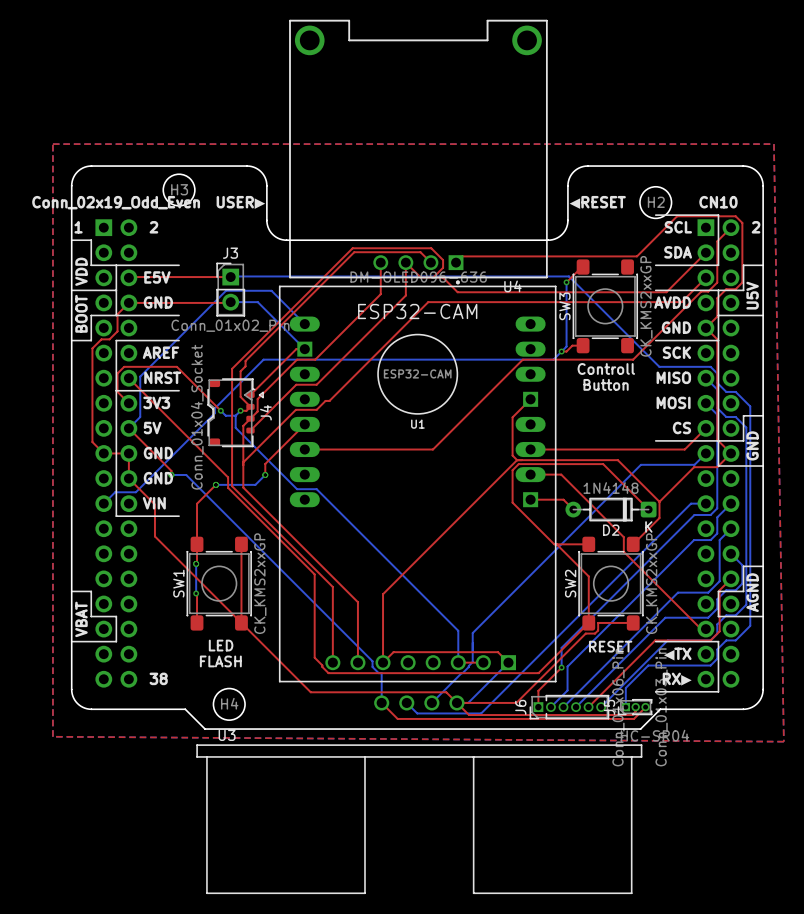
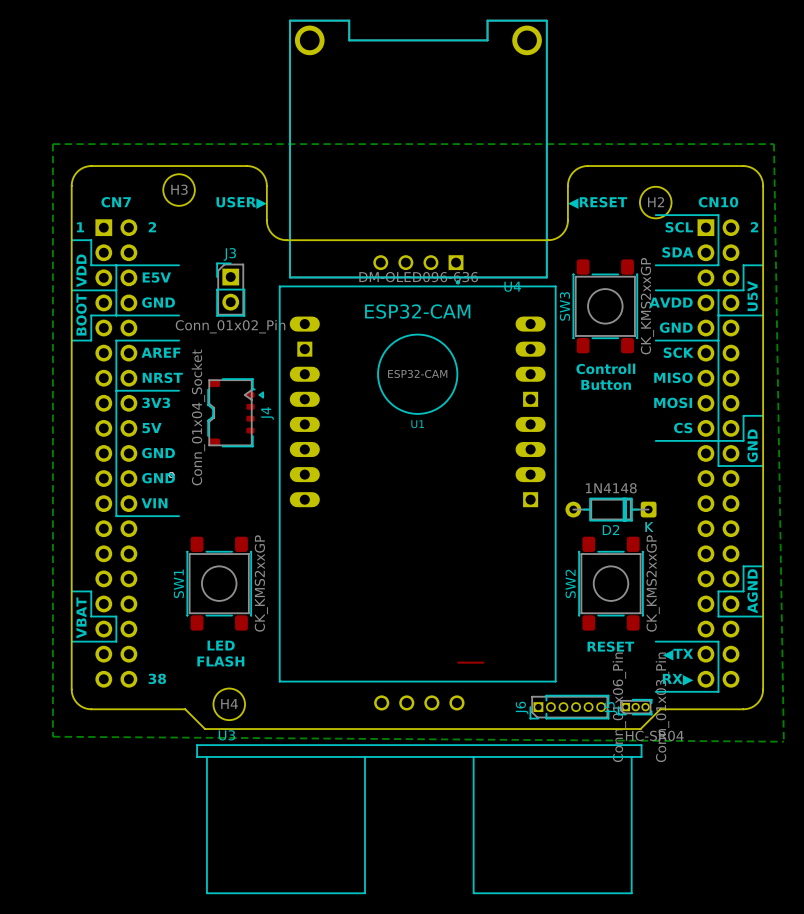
top zone outline: (52, 144) (773, 144) (783, 741) (52, 736) (52, 144) -> none
part value: Conn_02x19_Odd_Even (116, 202) -> CN7 (116, 202)
top track: (731, 227) (717, 241) (717, 282) (708, 291) (701, 291) (633, 359) (522, 359) (432, 449) (304, 449) -> none
top track: (705, 252) (666, 292) (457, 292) (443, 277) (420, 277) (405, 262) (405, 295) (316, 384) (296, 384) (250, 430) -> none
top track: (380, 262) (380, 294) (315, 359) (297, 359) (257, 399) (257, 411) (243, 425) (243, 487) (357, 602) (357, 662) -> none
top track: (430, 262) (420, 252) (354, 252) (245, 360) (245, 366) (240, 371) (240, 396) (250, 406) (246, 410) (240, 410) -> none
top track: (456, 262) (462, 256) (636, 256) (677, 216) (735, 216) (742, 222) (742, 282) (735, 289) (726, 289) (717, 298) (717, 316) (705, 328) (717, 339) (717, 439) (731, 453) (717, 467) (694, 467) (659, 501) -> none
top track: (583, 267) (566, 282) -> none
top track: (230, 277) (128, 277) -> none
bottom track: (230, 277) (569, 276) (659, 366) (710, 366) (717, 373) (717, 382) (726, 391) (735, 391) (750, 406) (750, 625) (735, 640) (726, 640) (717, 649) (717, 658) (710, 665) (648, 665) (625, 688) (625, 707) -> none
top track: (433, 277) (443, 267) (443, 260) (431, 248) (352, 248) (232, 368) (232, 486) (332, 587) (332, 662) -> none
top track: (705, 277) (681, 302) (428, 302) (329, 400) (325, 400) (316, 409) (295, 409) (243, 462) -> none
bottom track: (566, 282) (566, 346) (553, 359) (263, 359) (214, 408) (214, 413) (135, 492) (115, 492) (103, 503) -> none
via: (566, 282) -> none
top track: (230, 302) (128, 302) (117, 314) (117, 331) (109, 339) (101, 339) (92, 348) (92, 442) (103, 453) (128, 453) (128, 478) (154, 504) (154, 536) (310, 692) (446, 692) (469, 715) (632, 715) (635, 711) (635, 707) -> none
bottom track: (230, 302) (257, 302) (304, 349) -> none
bottom track: (304, 324) (271, 290) (226, 290) (140, 376) (140, 417) (128, 428) -> none
top track: (583, 345) (572, 345) (566, 351) (561, 351) -> none
top track: (304, 349) (296, 349) (250, 394) -> none
via: (561, 351) -> none
top track: (128, 378) (228, 477) (228, 487) (314, 574) (314, 657) (328, 673) (538, 673) (588, 622) (588, 576) (556, 544) -> none
bottom track: (705, 378) (717, 389) (717, 407) (726, 417) (735, 417) (746, 427) (746, 604) (735, 615) (726, 615) (717, 624) (717, 633) (710, 640) (667, 640) (601, 707) -> none
top track: (530, 399) (512, 417) (512, 455) (517, 460) -> none
top track: (128, 403) (117, 391) (117, 373) (124, 366) (176, 366) (220, 410) -> none
bottom track: (705, 403) (717, 414) (717, 508) (710, 514) (694, 514) (561, 647) (561, 667) -> none
bottom track: (220, 410) (225, 415) (235, 415) -> none
via: (220, 410) -> none
bottom track: (240, 410) (235, 415) -> none
via: (240, 410) -> none
bottom track: (235, 415) (235, 427) (297, 489) (316, 489) (458, 630) (458, 662) -> none
top track: (304, 424) (265, 463) (265, 474) -> none
top track: (128, 428) (171, 470) (171, 474) -> none
top track: (705, 428) (684, 449) (530, 449) -> none
bottom track: (705, 453) (694, 464) (640, 464) (472, 633) (472, 662) (431, 702) -> none
bottom track: (171, 474) (186, 474) (372, 661) (372, 667) (378, 673) (381, 673) (381, 702) -> none
bottom track: (265, 474) (255, 484) (215, 484) -> none
via: (265, 474) -> none
top track: (530, 474) (561, 474) (623, 537) (623, 551) (701, 629) (705, 629) -> none
top track: (215, 484) (197, 503) (196, 563) -> none
via: (215, 484) -> none
top track: (530, 499) (563, 499) (573, 509) -> none
top track: (659, 501) (659, 518) (633, 544) -> none
top track: (659, 501) (617, 460) (517, 460) (383, 594) (383, 662) (393, 652) (497, 652) (508, 662) -> none
bottom track: (705, 503) (691, 503) (481, 713) (417, 713) (406, 702) -> none
bottom track: (731, 503) (717, 517) (717, 533) (710, 540) (694, 540) (567, 666) (567, 690) (550, 707) -> none
top track: (648, 509) (603, 464) (518, 464) (512, 470) (512, 502) (554, 544) (588, 544) -> none
bottom track: (731, 528) (719, 540) (719, 581) (708, 592) (677, 592) (563, 707) -> none
top track: (240, 544) (241, 622) -> none
bottom track: (731, 553) (742, 565) (742, 583) (735, 590) (726, 590) (717, 599) (717, 608) (708, 617) (665, 617) (576, 707) -> none
bottom track: (196, 563) (196, 593) -> none
via: (196, 563) -> none
top track: (731, 578) (719, 590) (719, 631) (710, 640) (655, 640) (588, 707) -> none
top track: (196, 593) (197, 622) -> none
via: (196, 593) -> none
top track: (633, 622) (598, 622) (598, 630) (595, 633) (585, 633) (516, 702) (456, 702) -> none
part: (420, 662) -> none
bottom track: (508, 662) (468, 702) (456, 702) -> none
top track: (561, 667) (538, 690) (538, 707) -> none
via: (561, 667) -> none
top track: (381, 702) (397, 718) (633, 718) (645, 707) -> none

